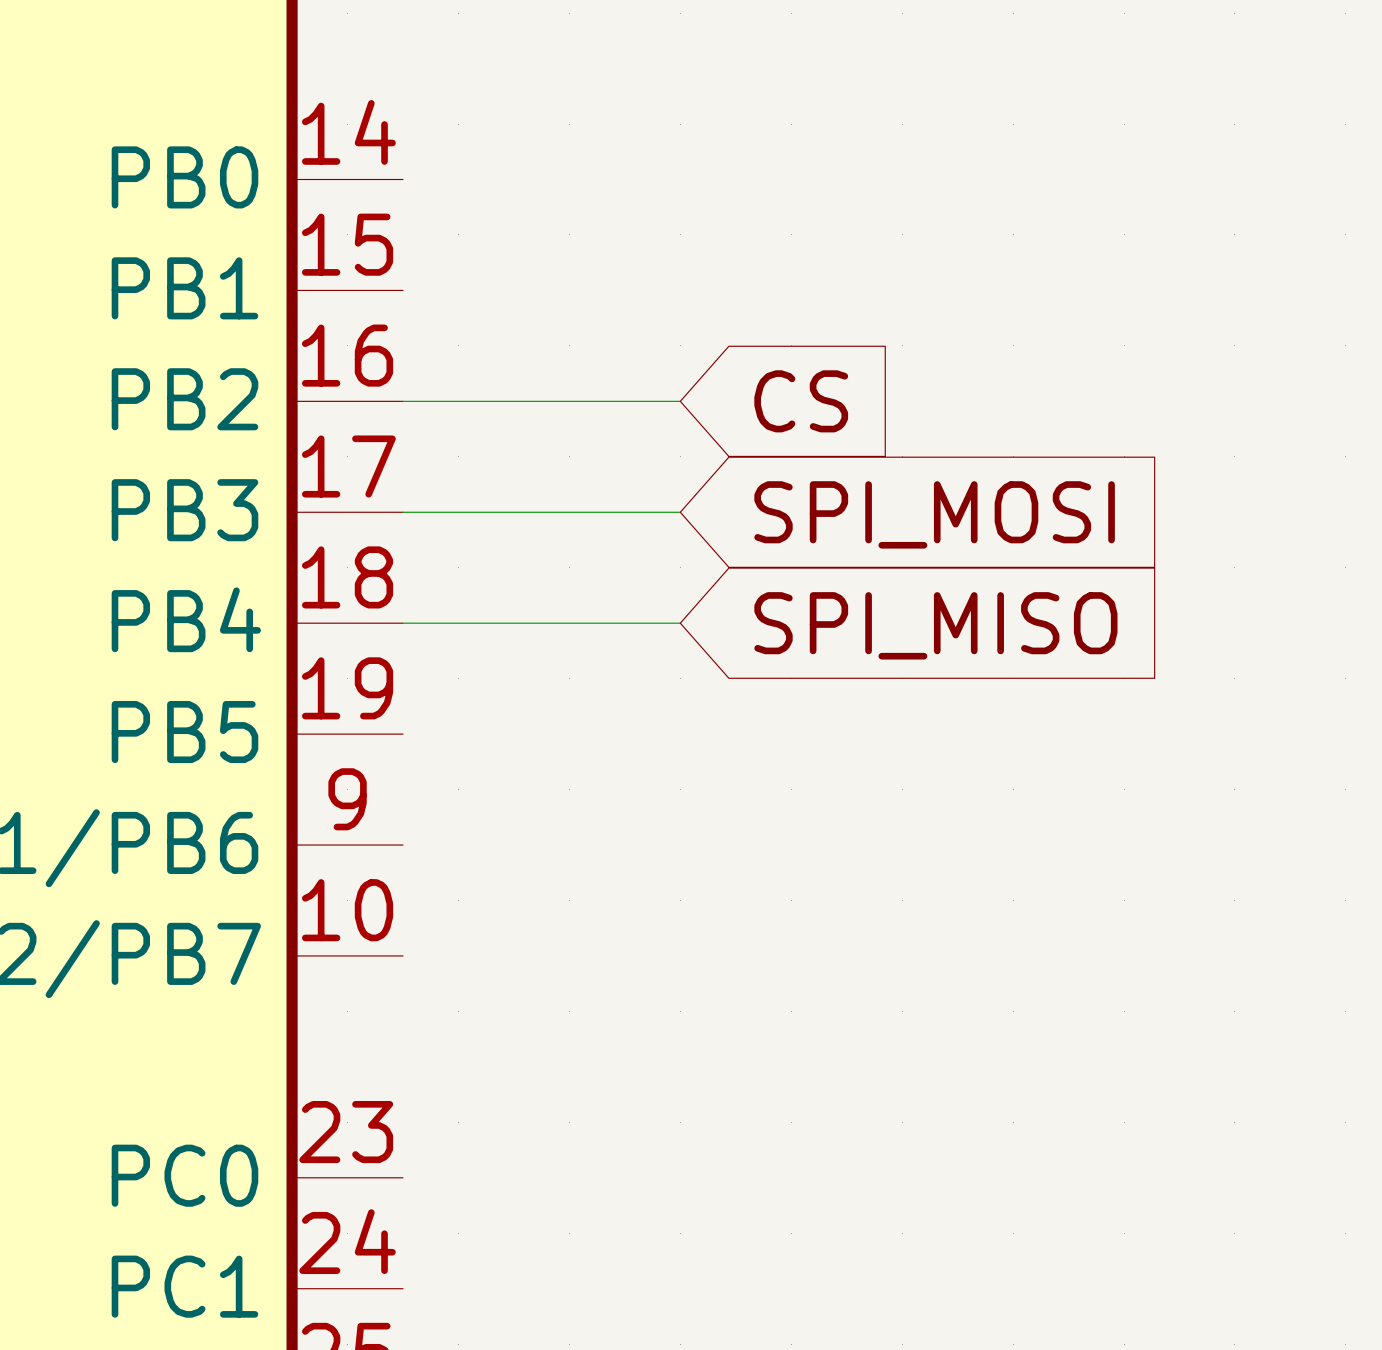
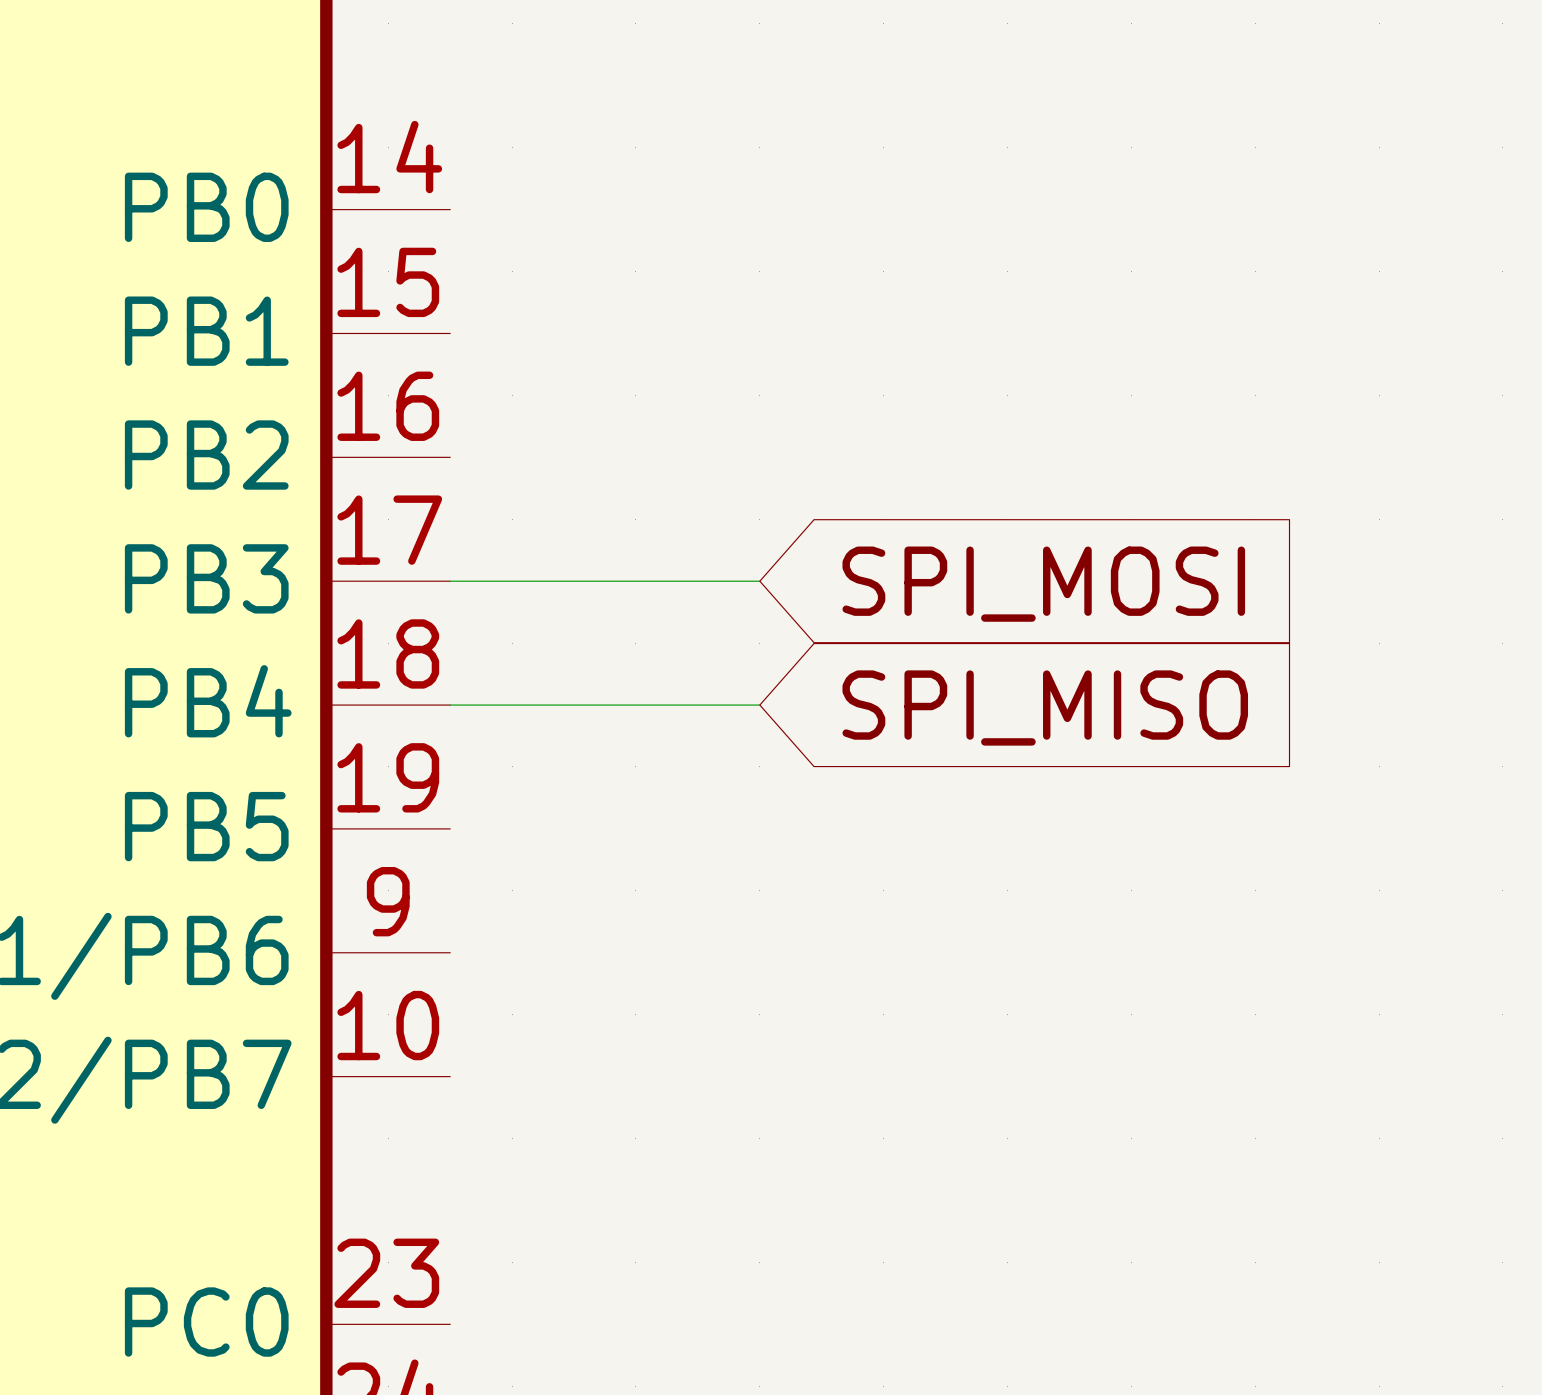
wire: (403, 401) (680, 401) -> none
global label: CS (801, 401) -> none

